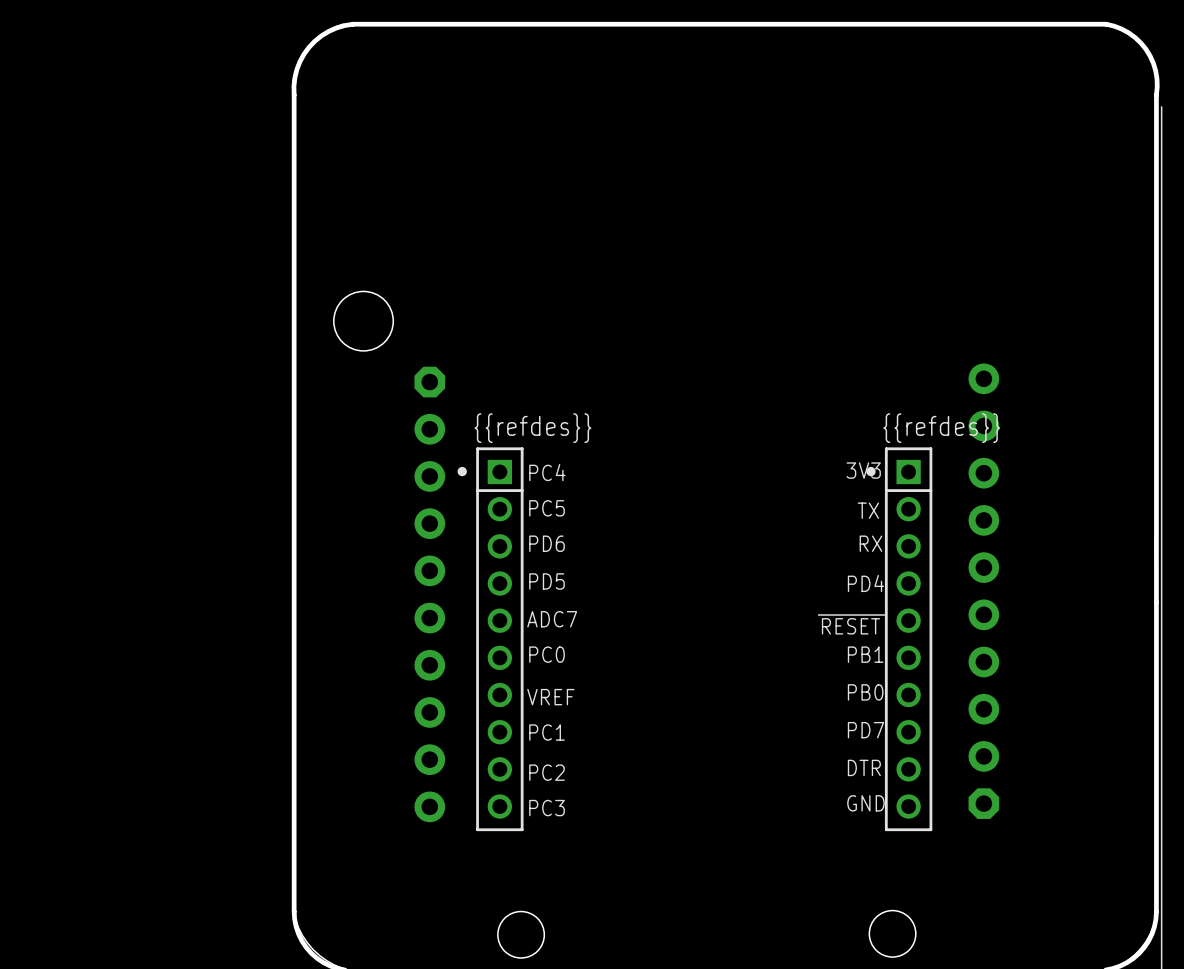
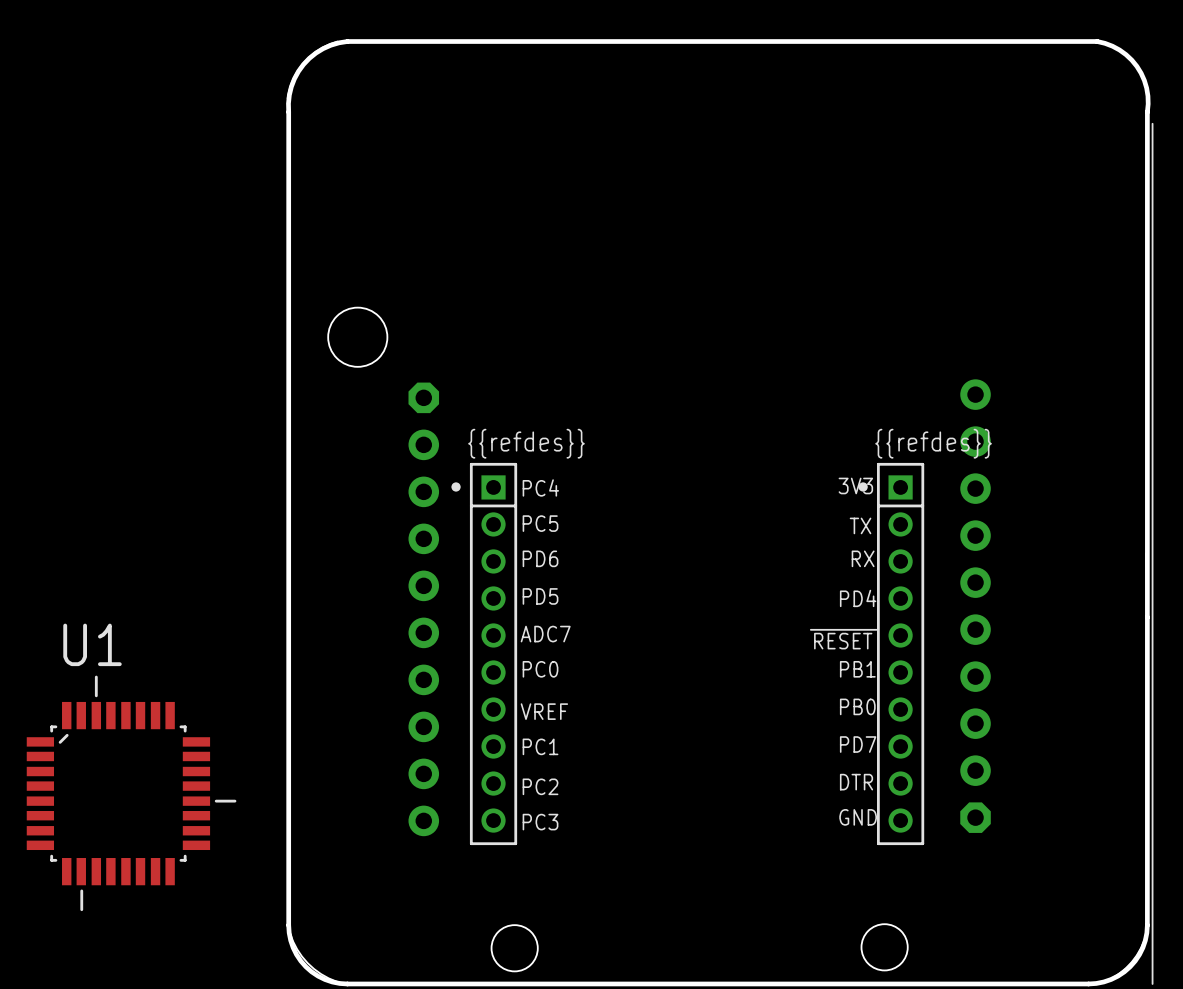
U1: none -> (131, 793)

